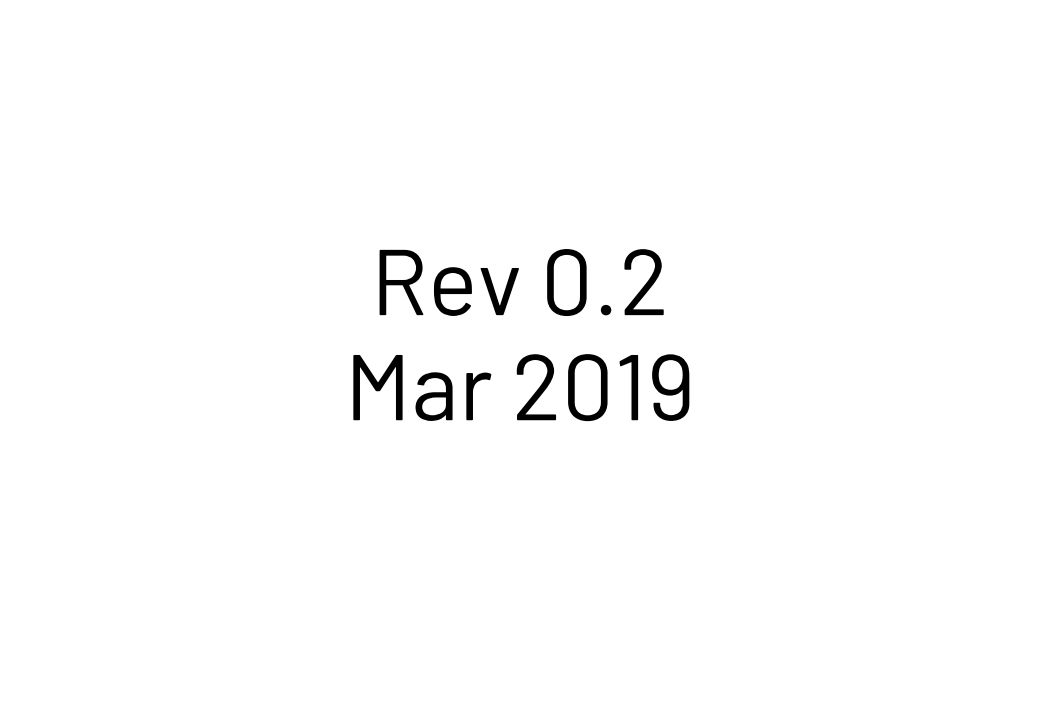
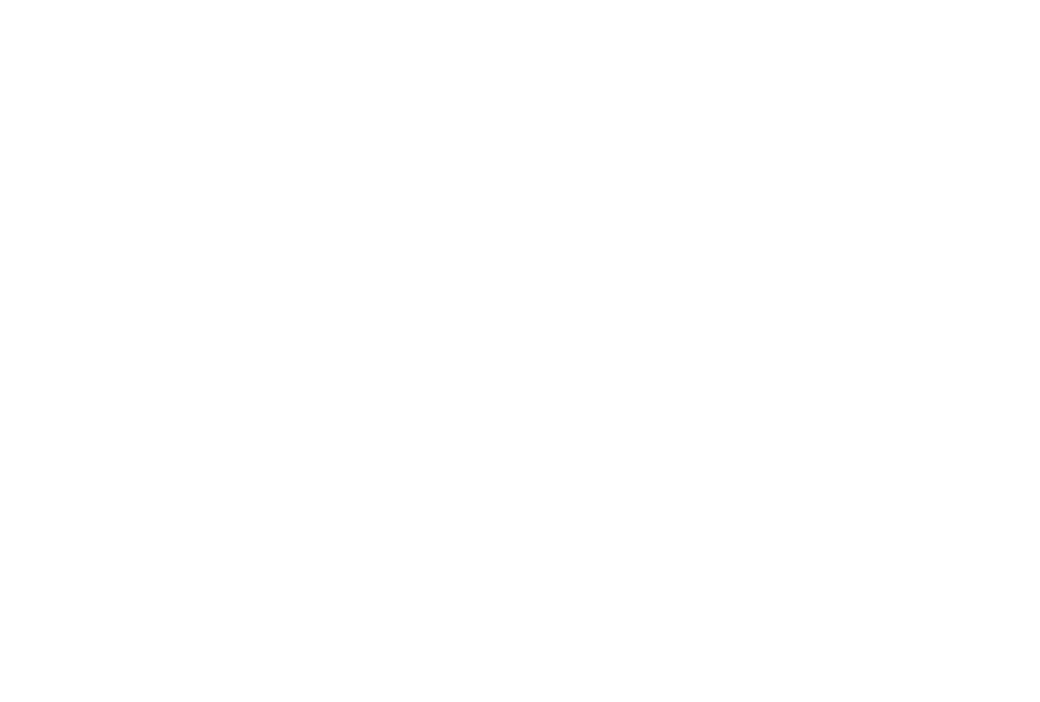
text: Rev 0.2 (521, 282) -> none
text: Mar 2019 (521, 387) -> none

